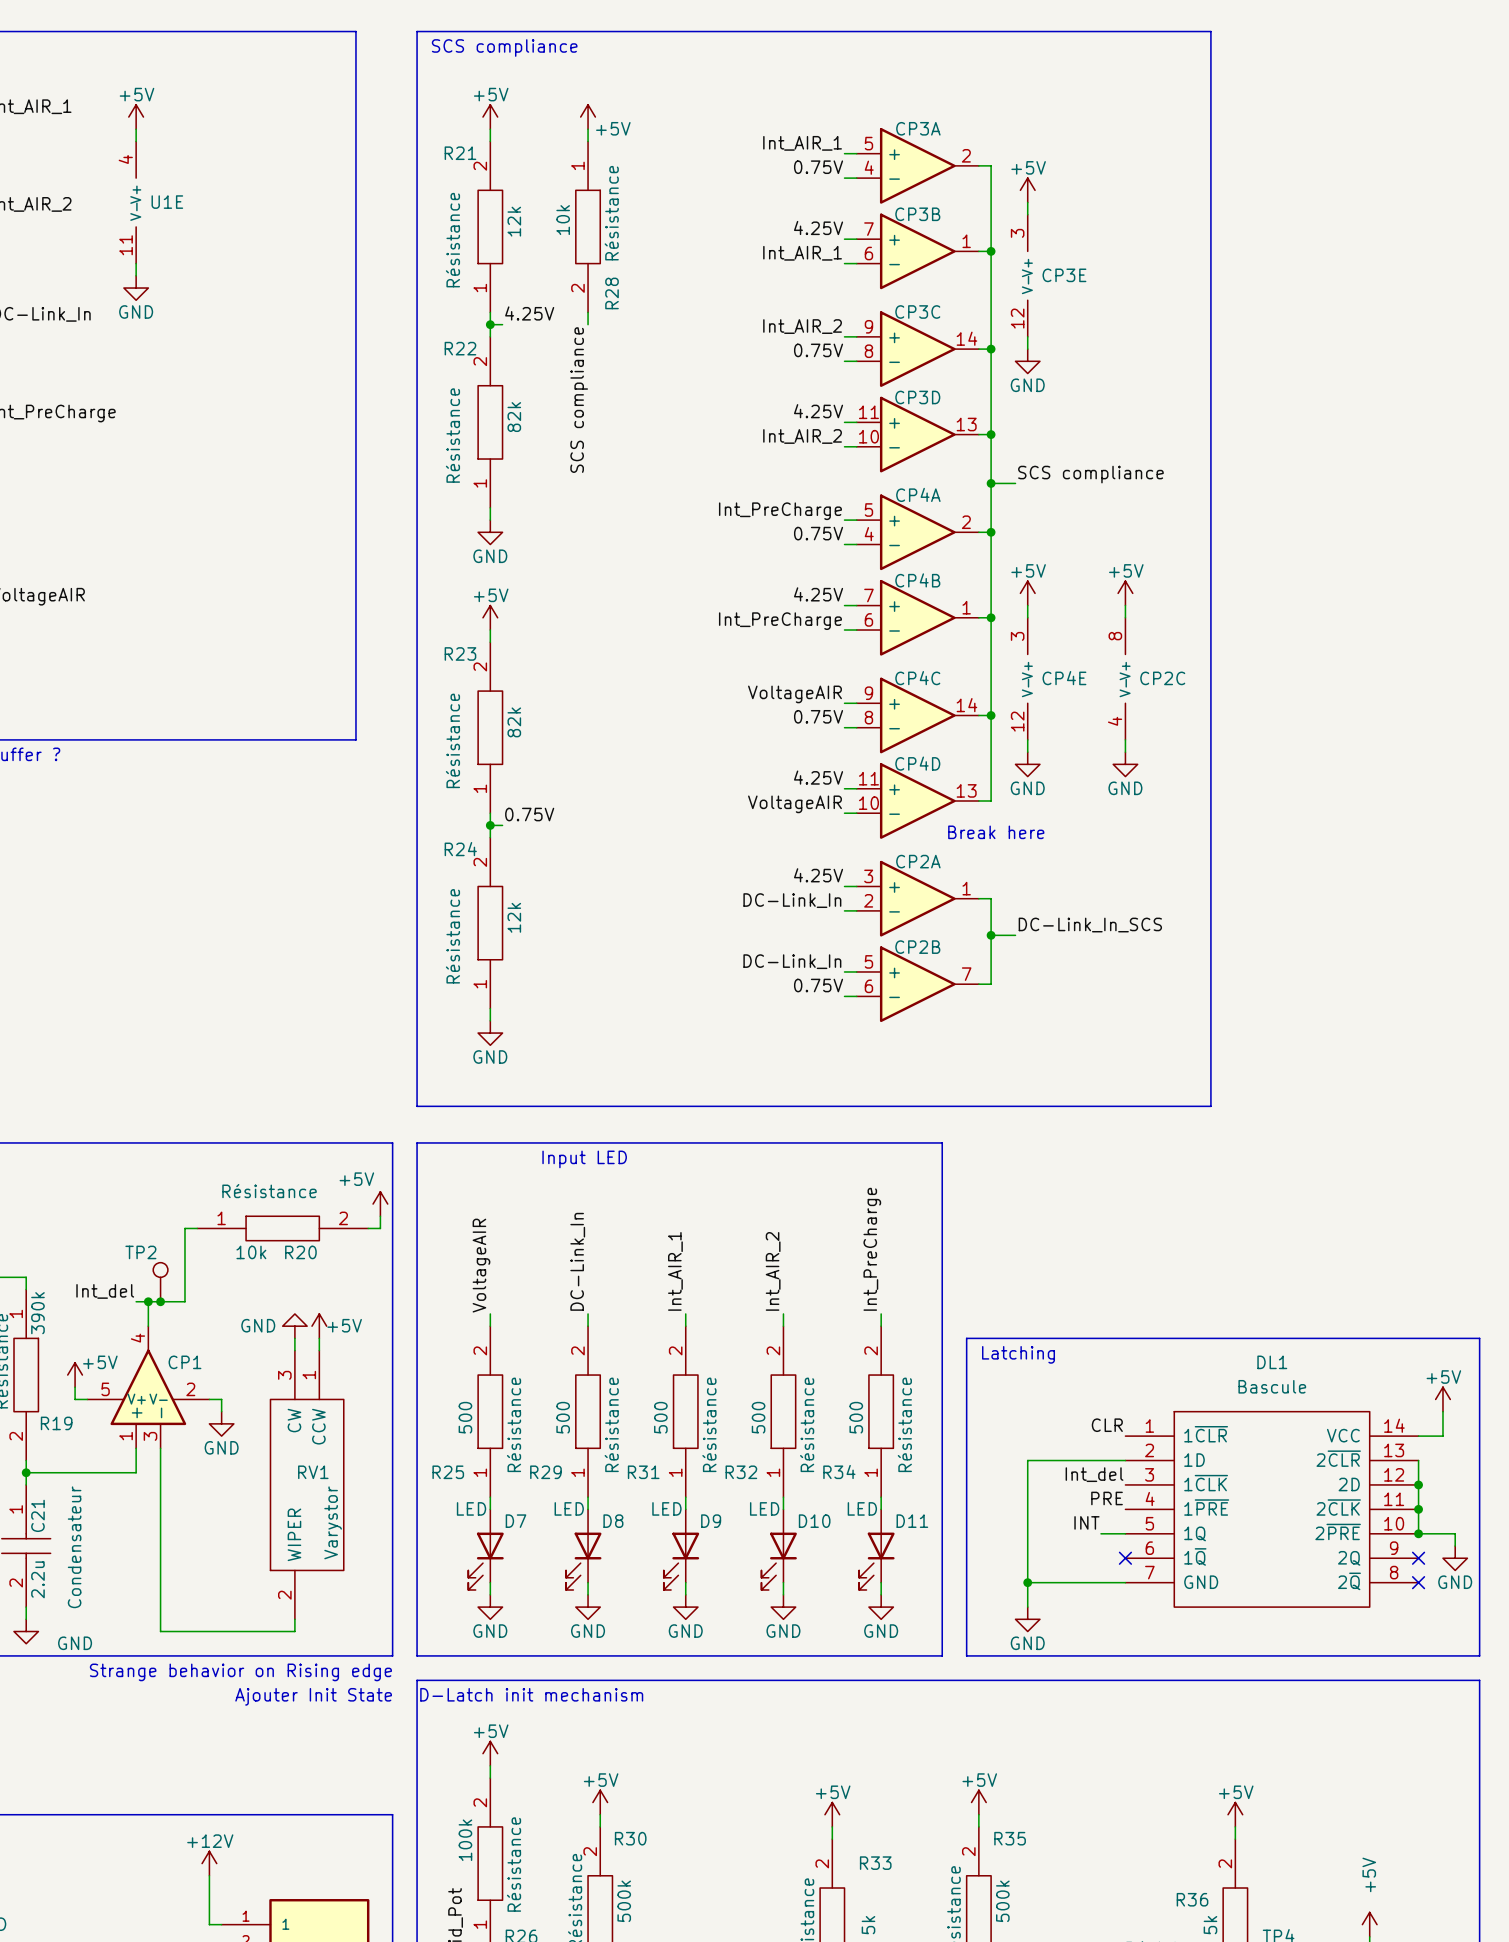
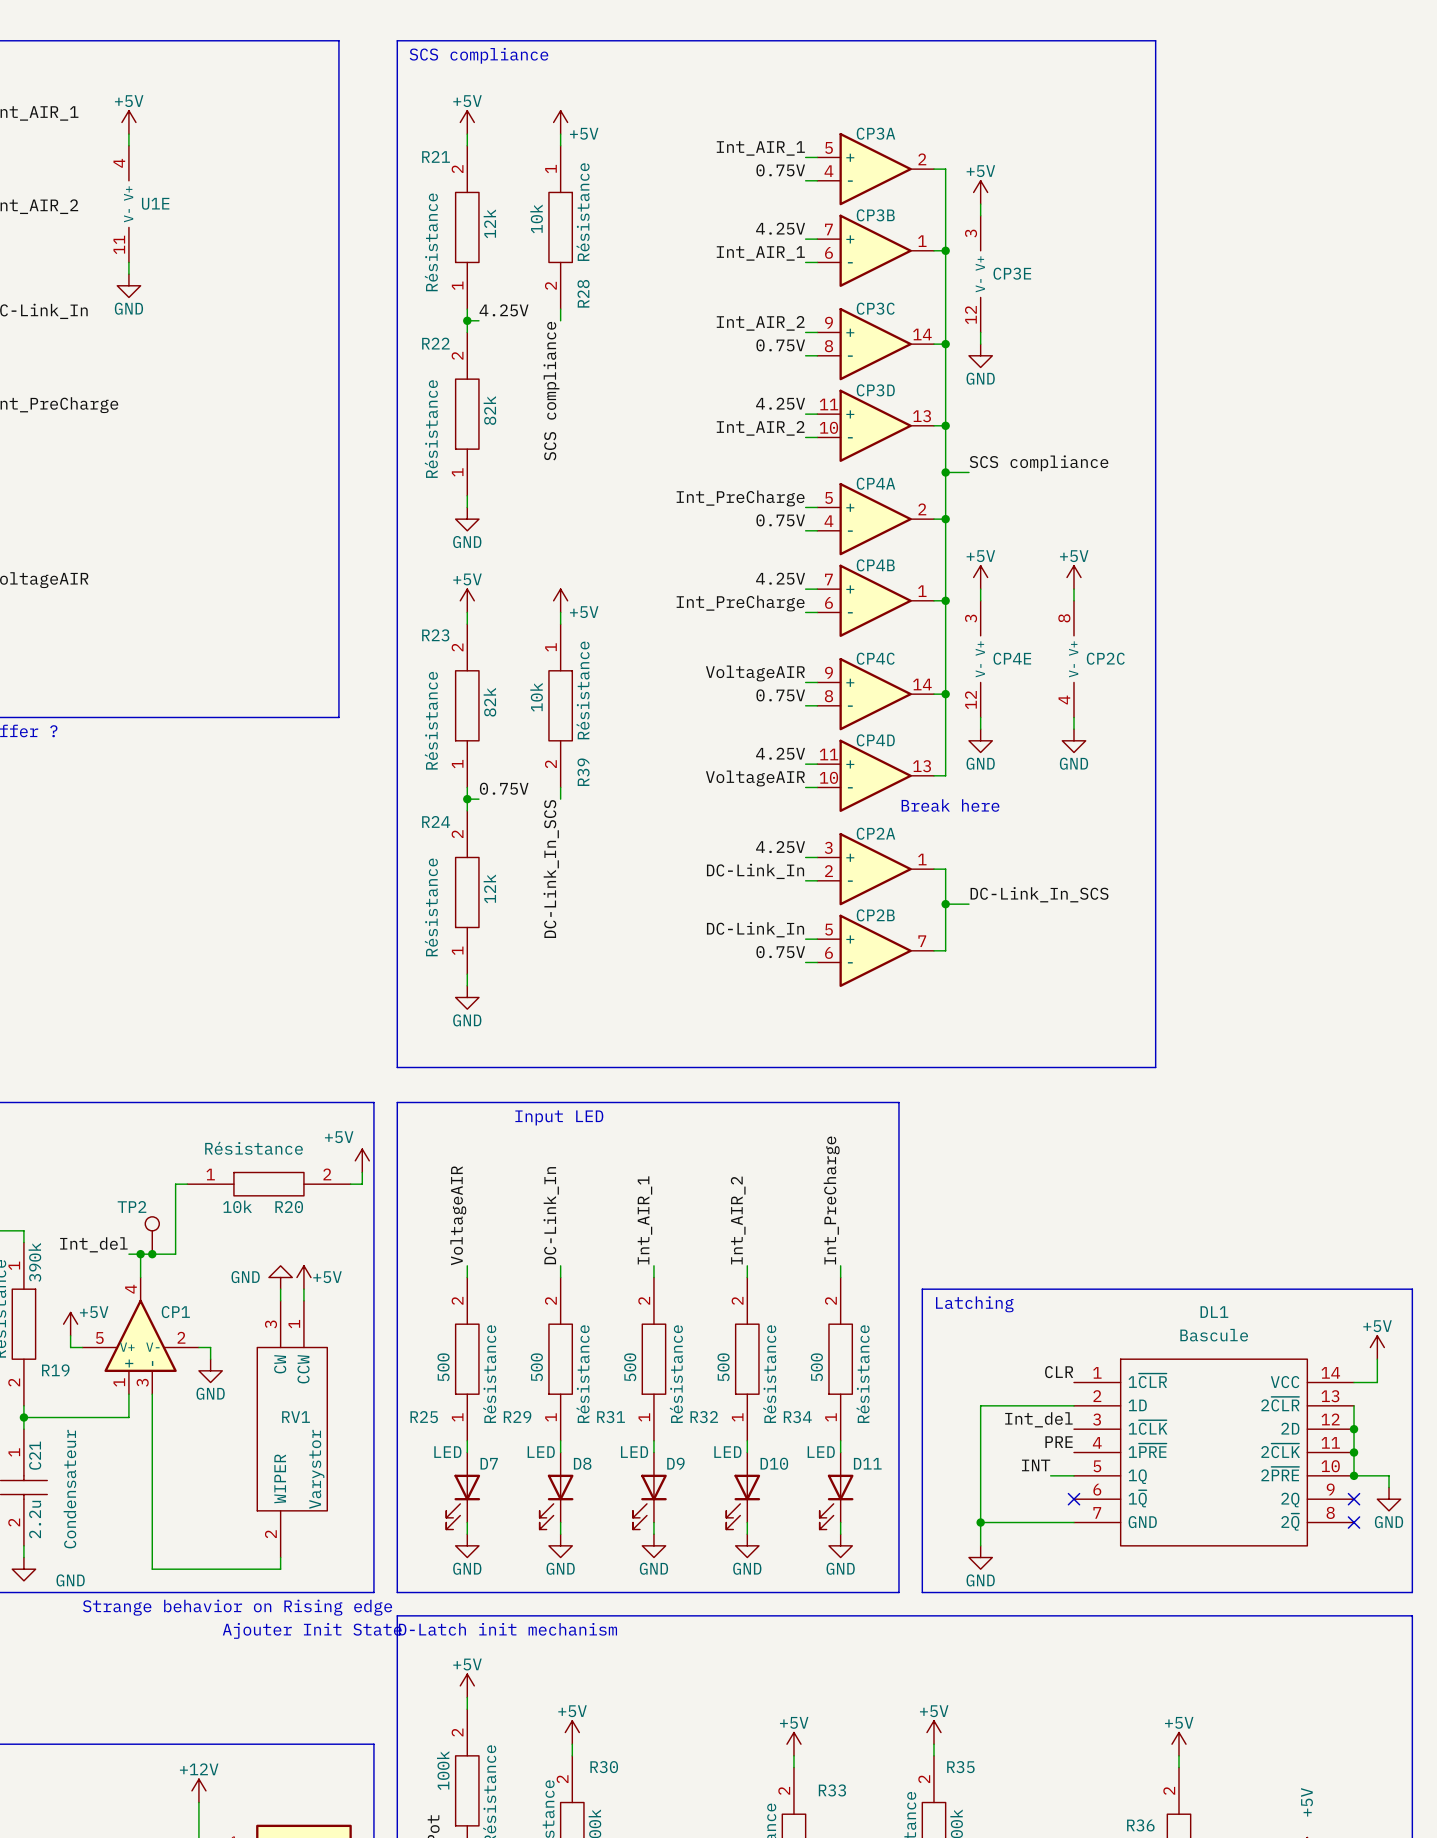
power symbol: none -> +5V (560, 600)
wire: none -> (560, 612) (560, 624)
R39: none -> 10k (560, 705)
wire: none -> (560, 787) (560, 799)
label: none -> DC-Link_In_SCS (551, 869)

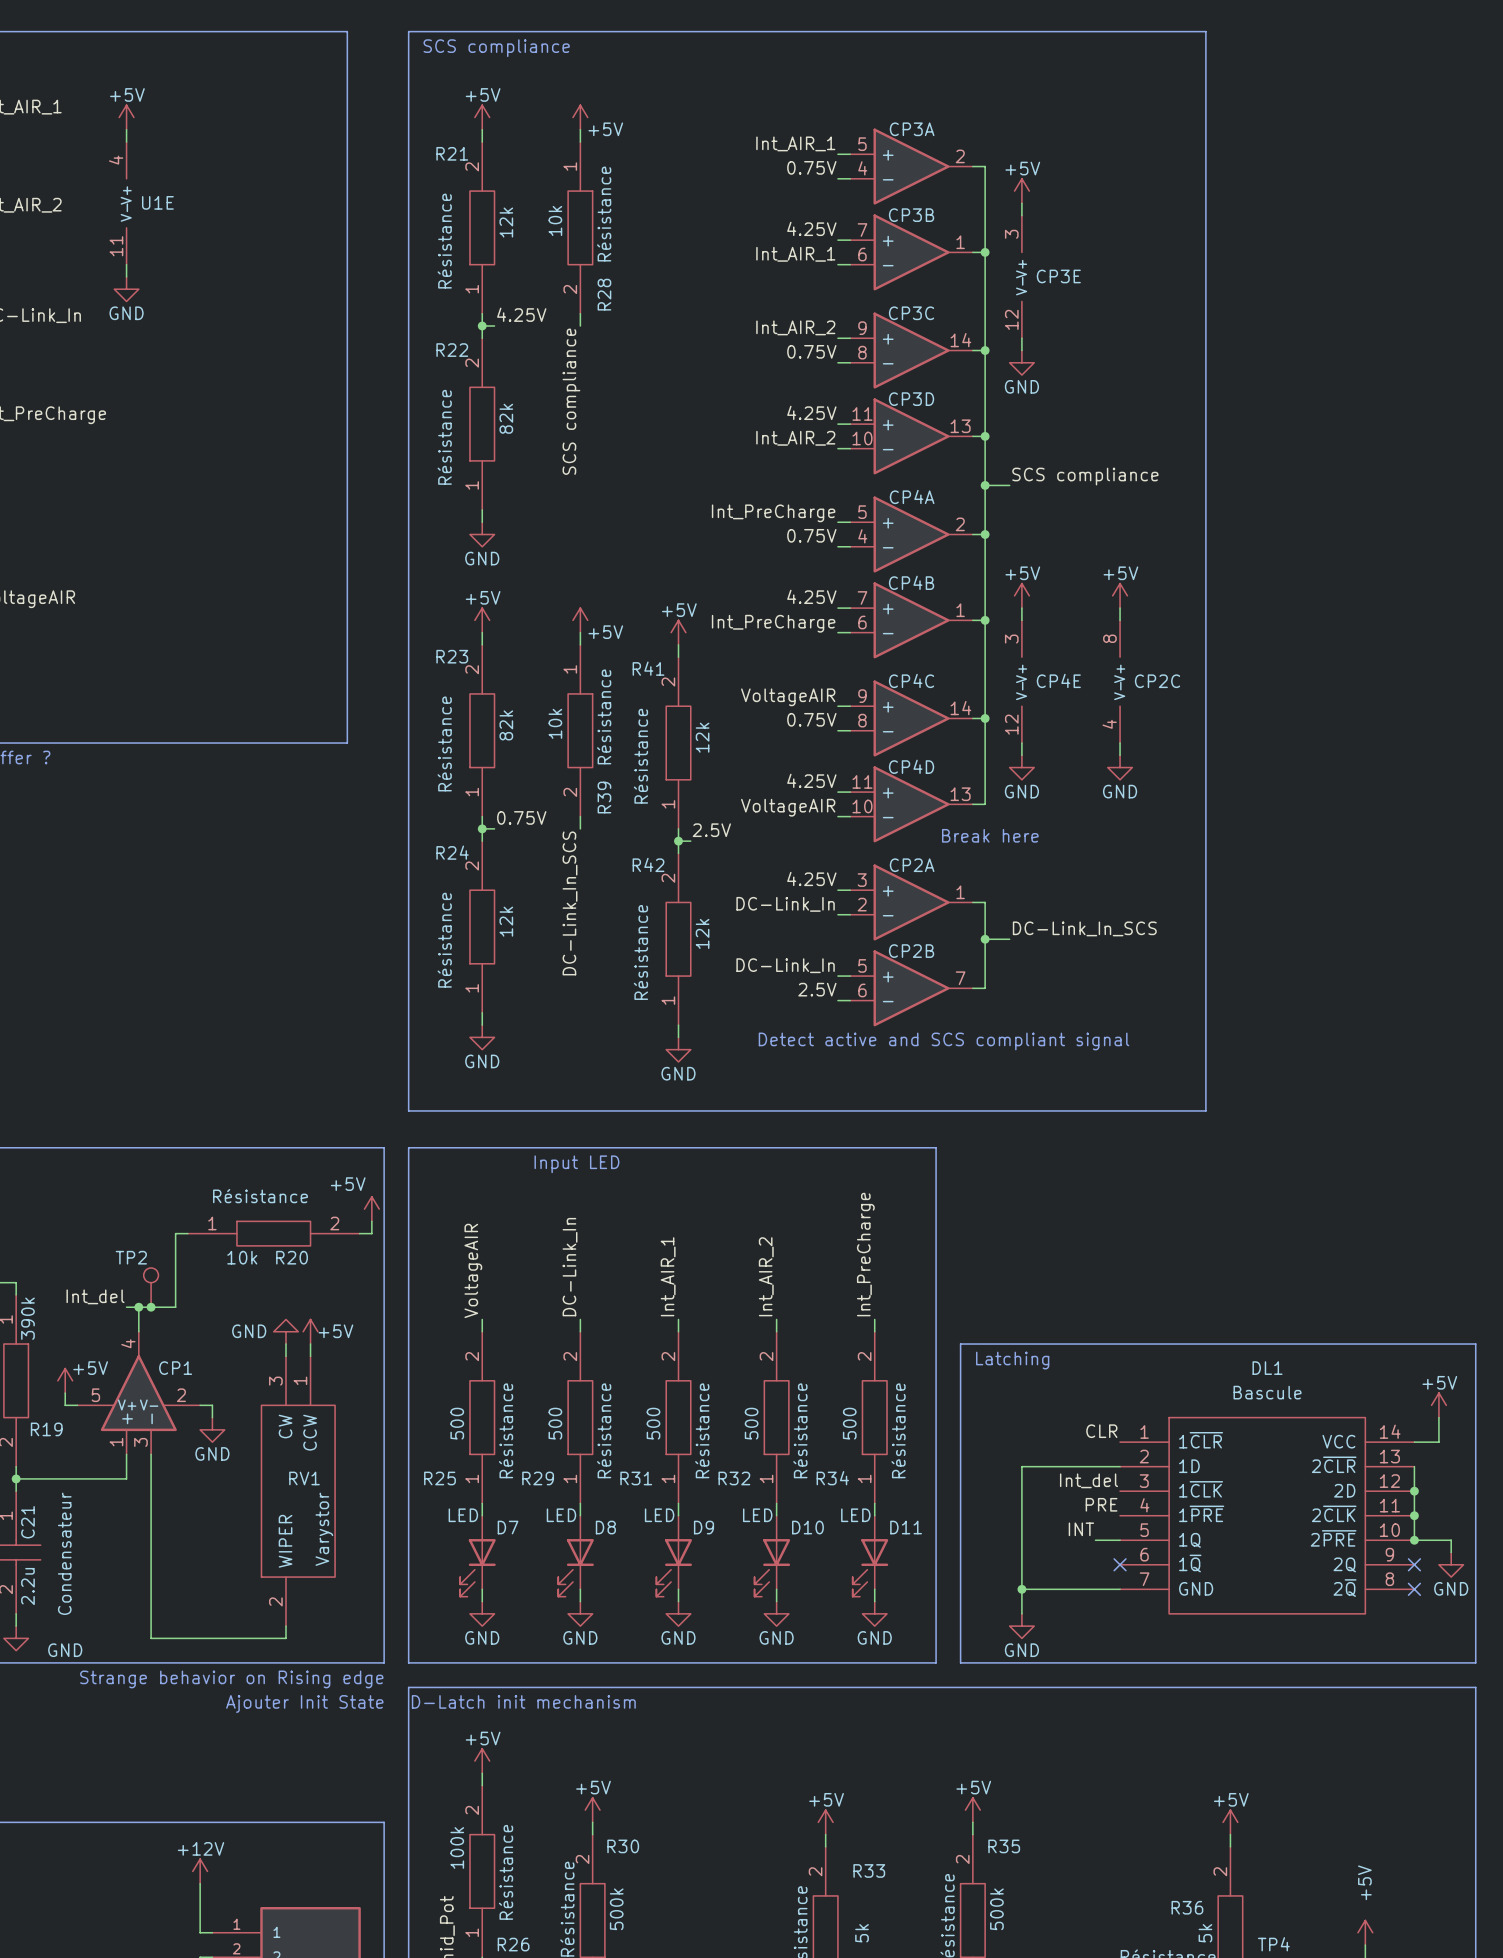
power symbol: none -> +5V (678, 632)
wire: none -> (678, 644) (678, 657)
R41: none -> 12k (678, 743)
wire: none -> (678, 828) (678, 853)
label: none -> 2.5V (711, 830)
wire: none -> (678, 841) (690, 841)
junction: none -> (678, 841)
R42: none -> 12k (678, 939)
label: 0.75V (780, 952) -> 2.5V (817, 989)
wire: none -> (678, 1025) (678, 1037)
text: none -> Detect active and SCS compliant signal (944, 1041)
power symbol: none -> GND (678, 1049)

